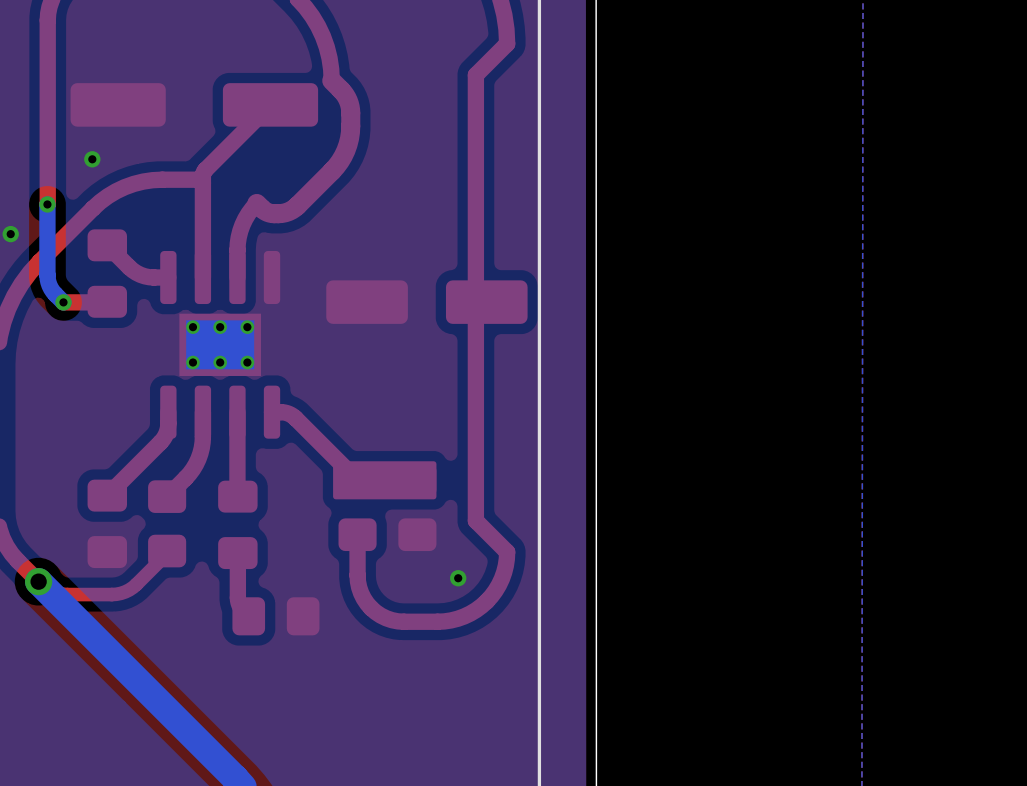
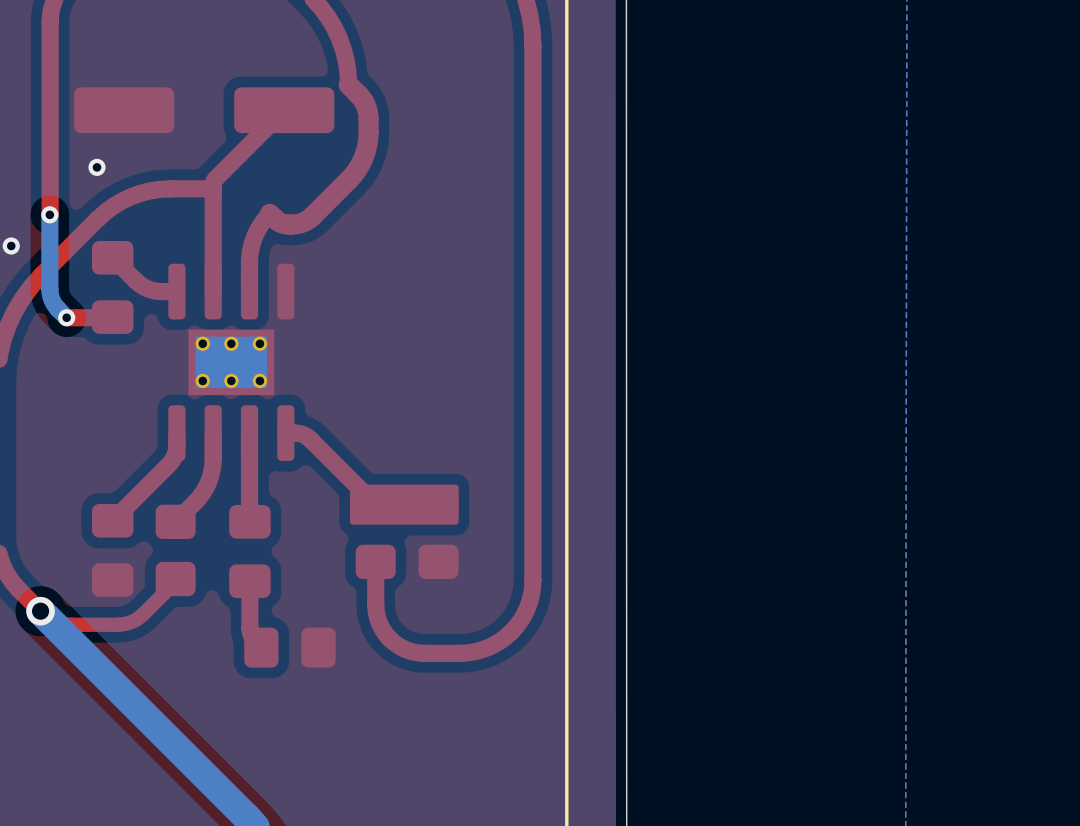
top track: (507, 43) (475, 75) (475, 520) (507, 552) -> (532, 46) (532, 580)
part: (426, 302) -> none
via: (458, 578) -> none

